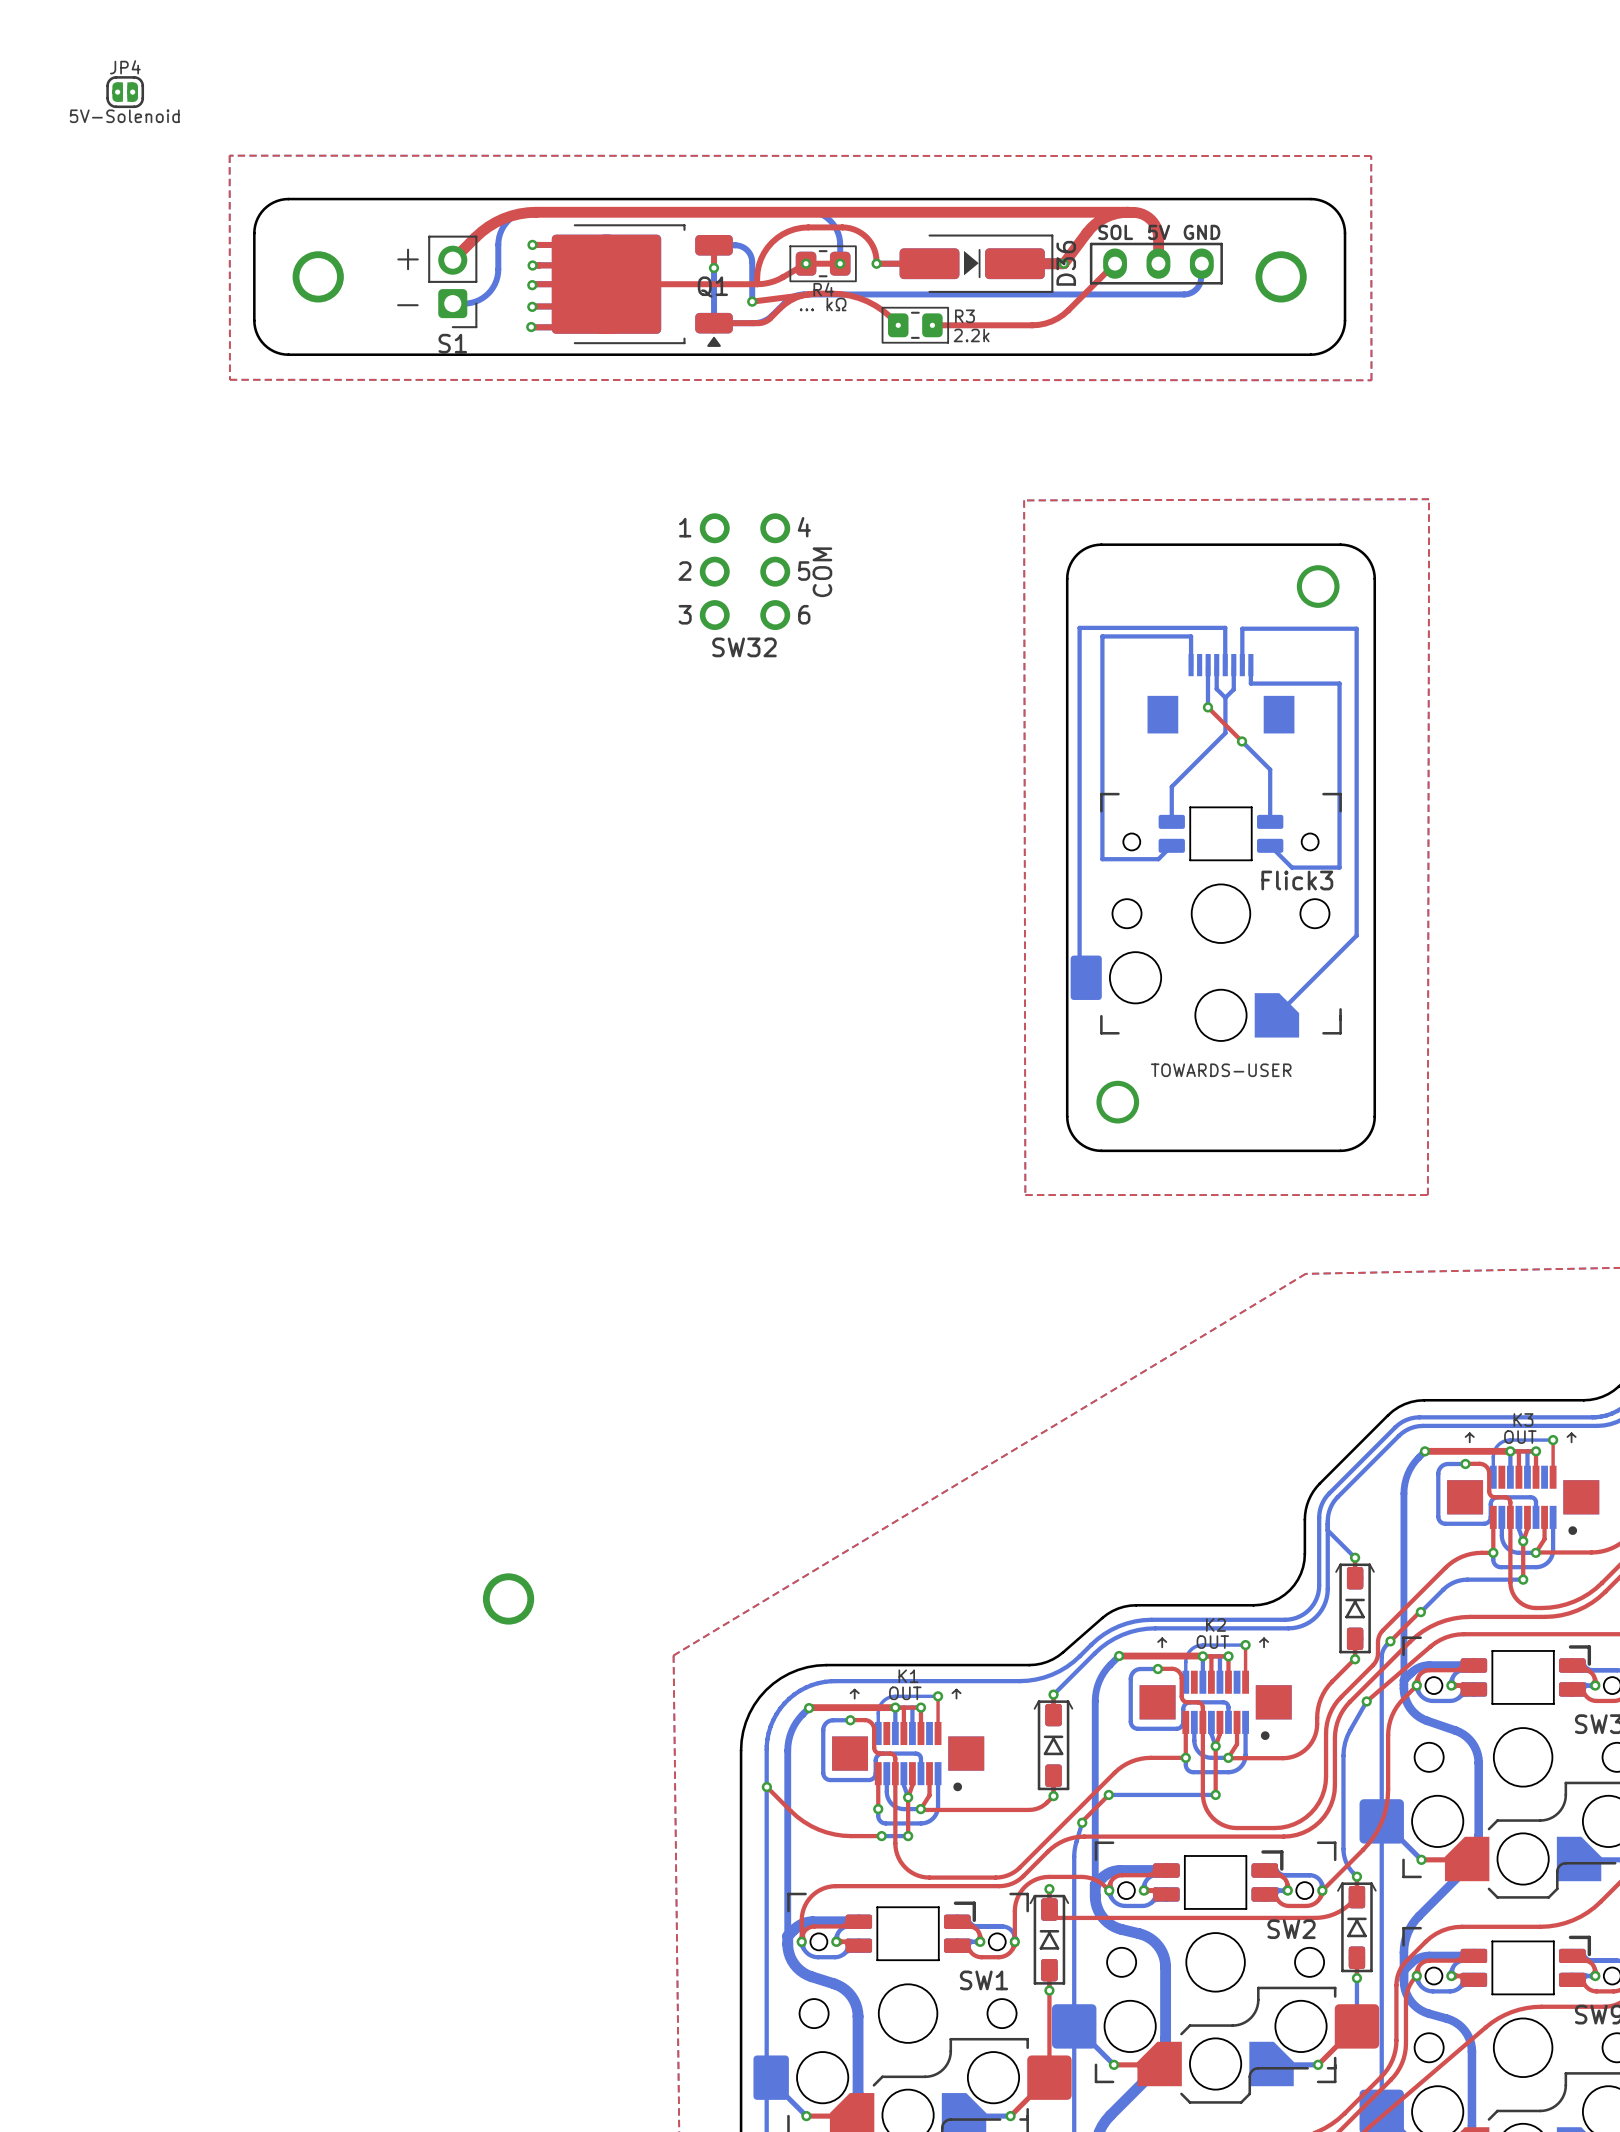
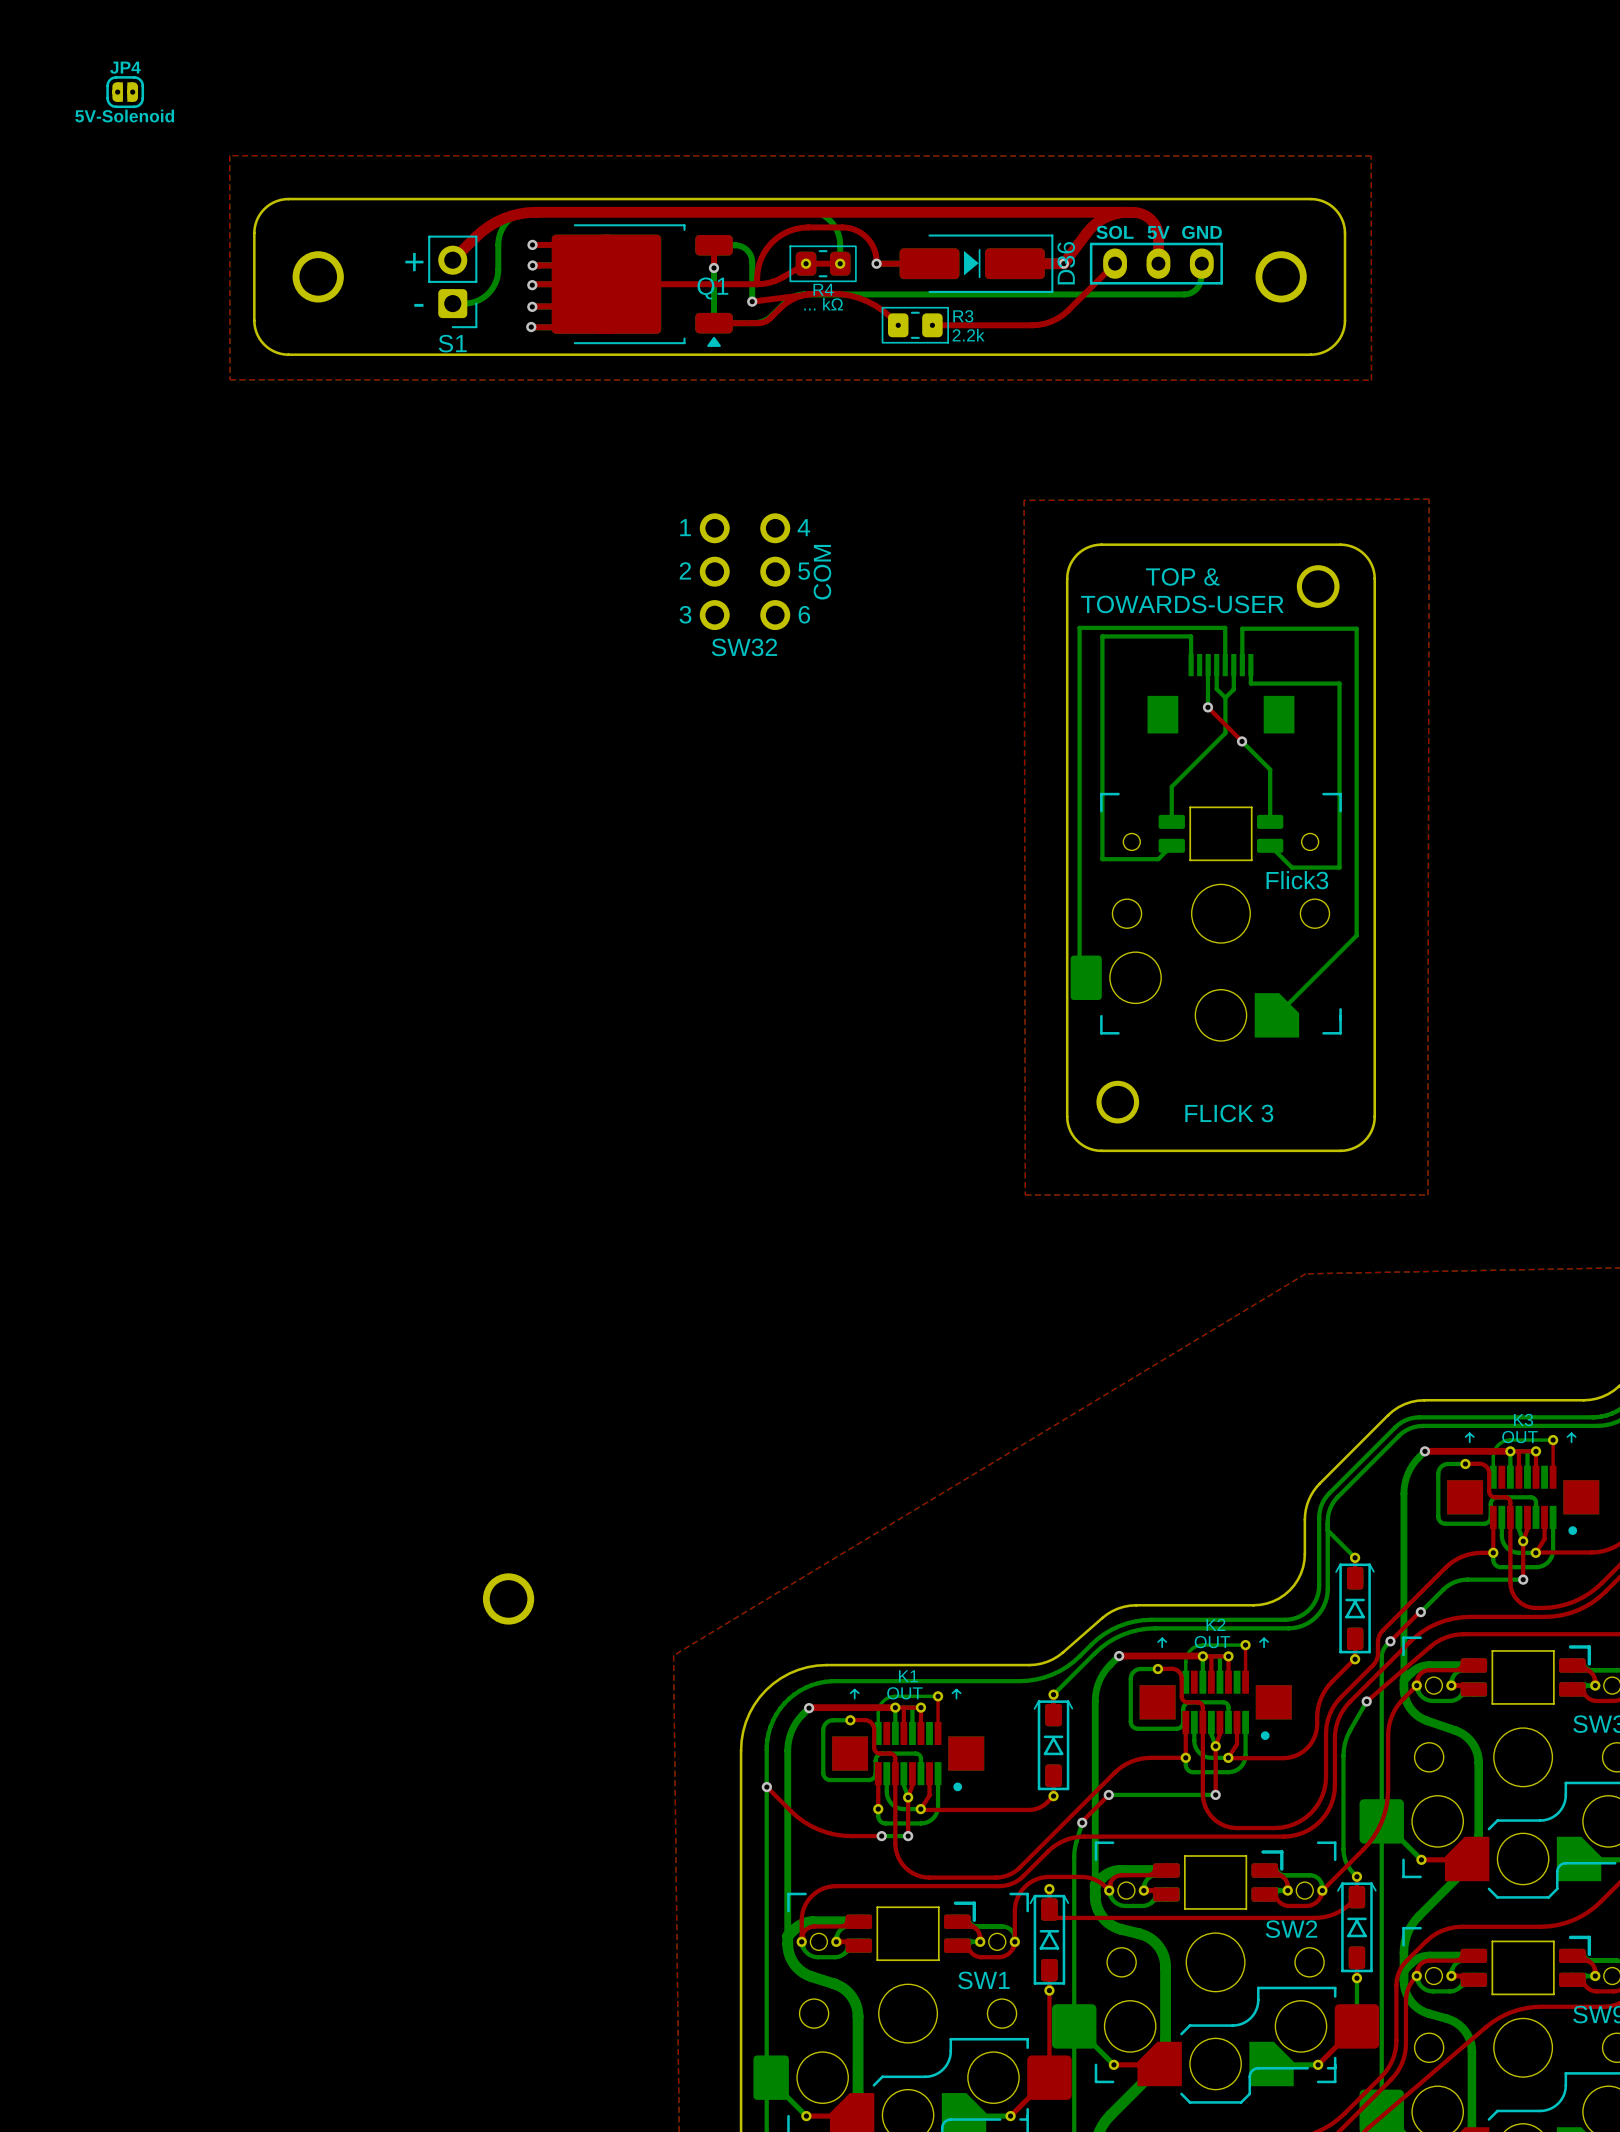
text: none -> TOP & (1182, 576)
text: none -> TOWARDS-USER (1182, 604)
text: TOWARDS-USER (1221, 1070) -> none
text: none -> FLICK 3 (1229, 1113)

